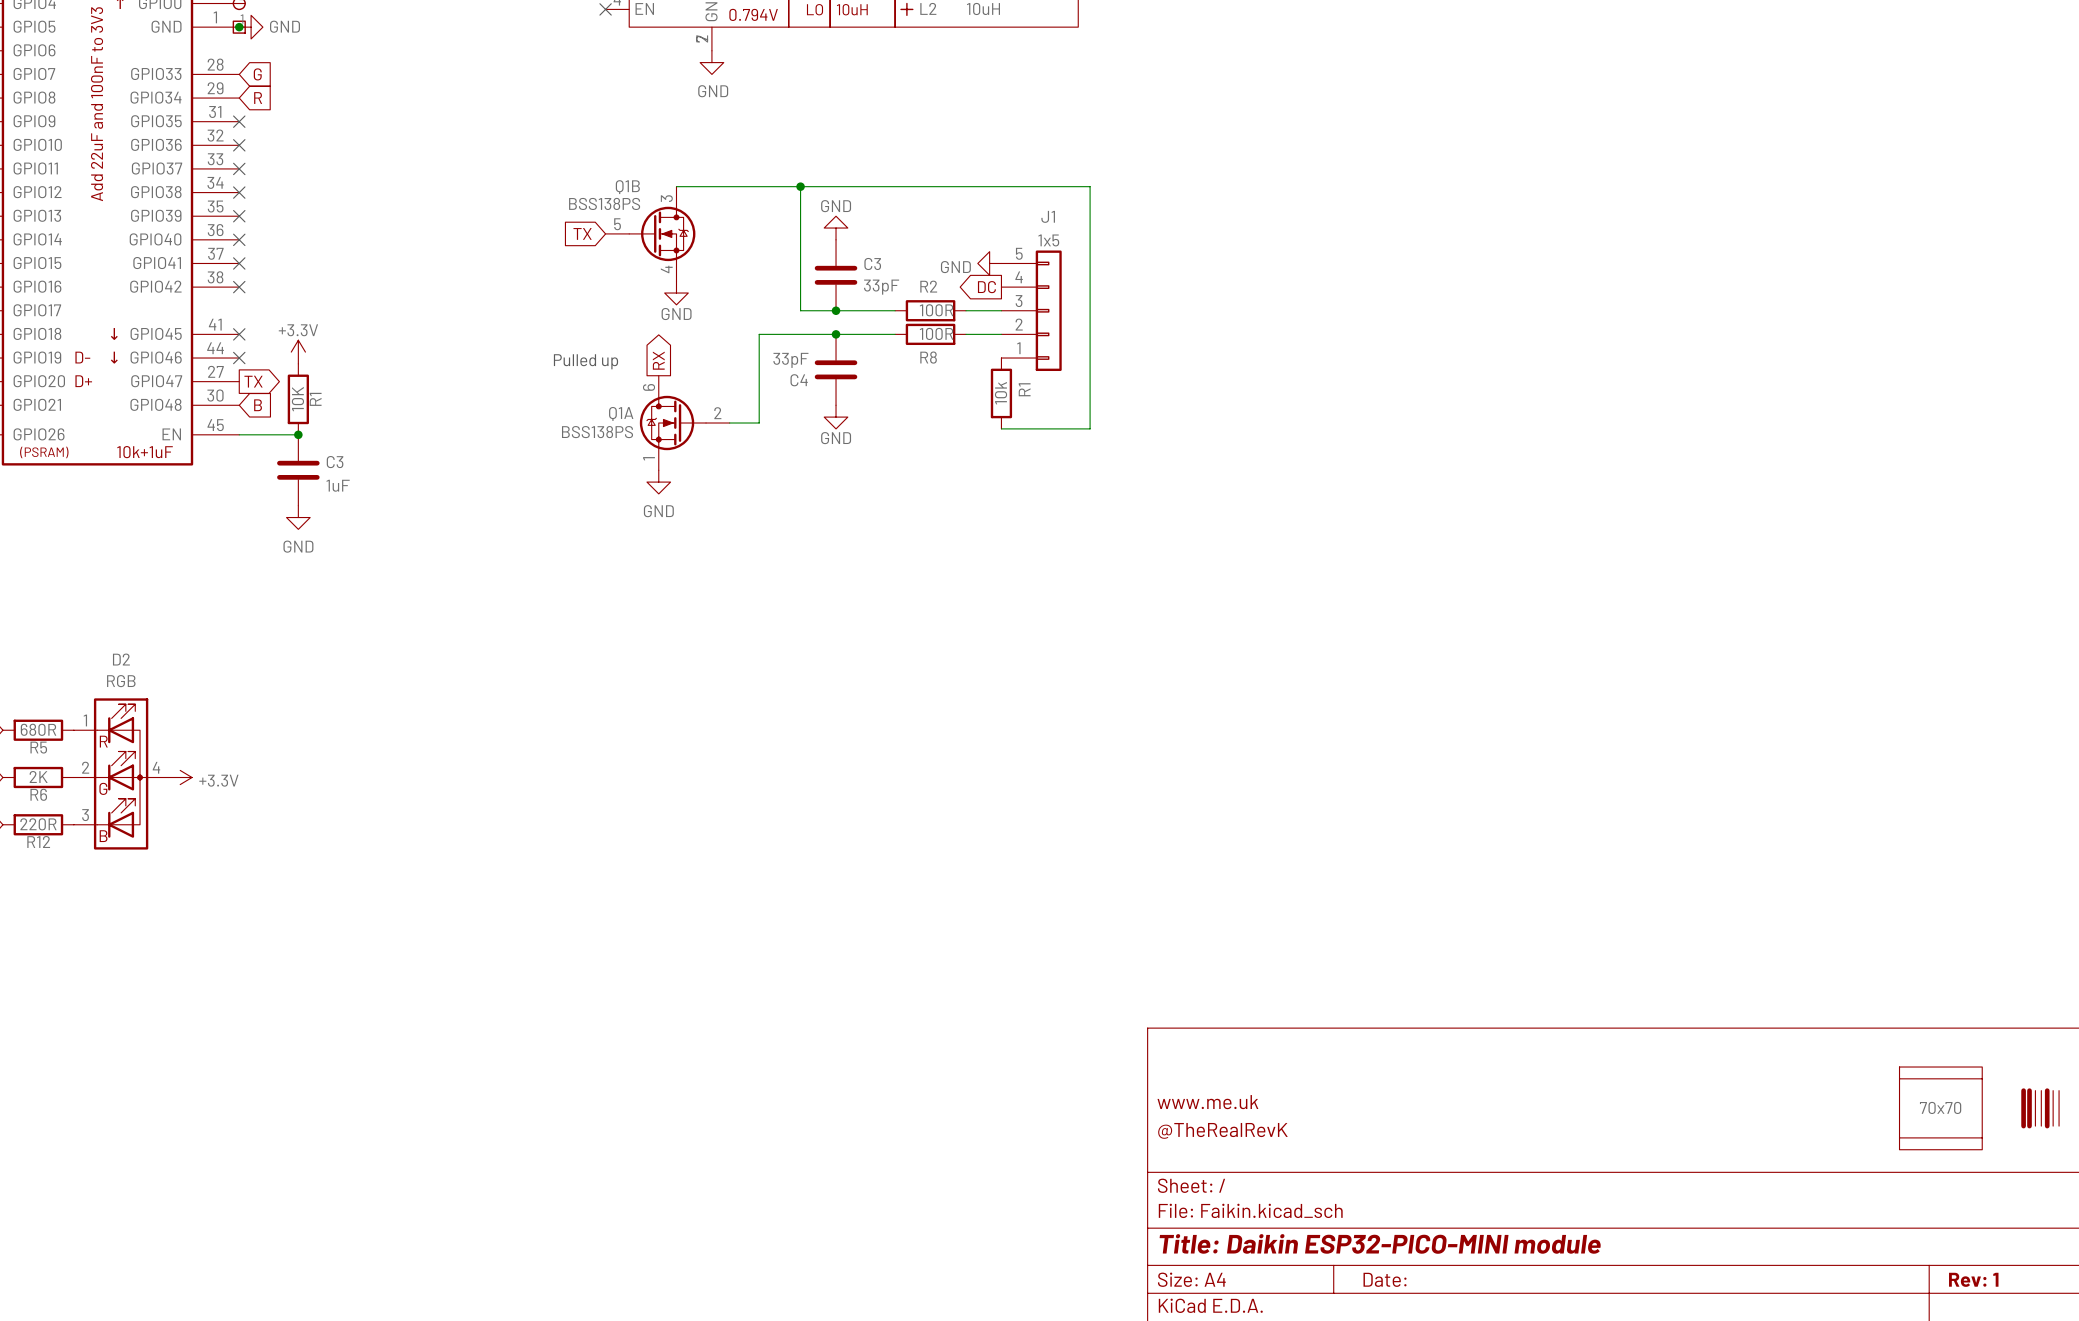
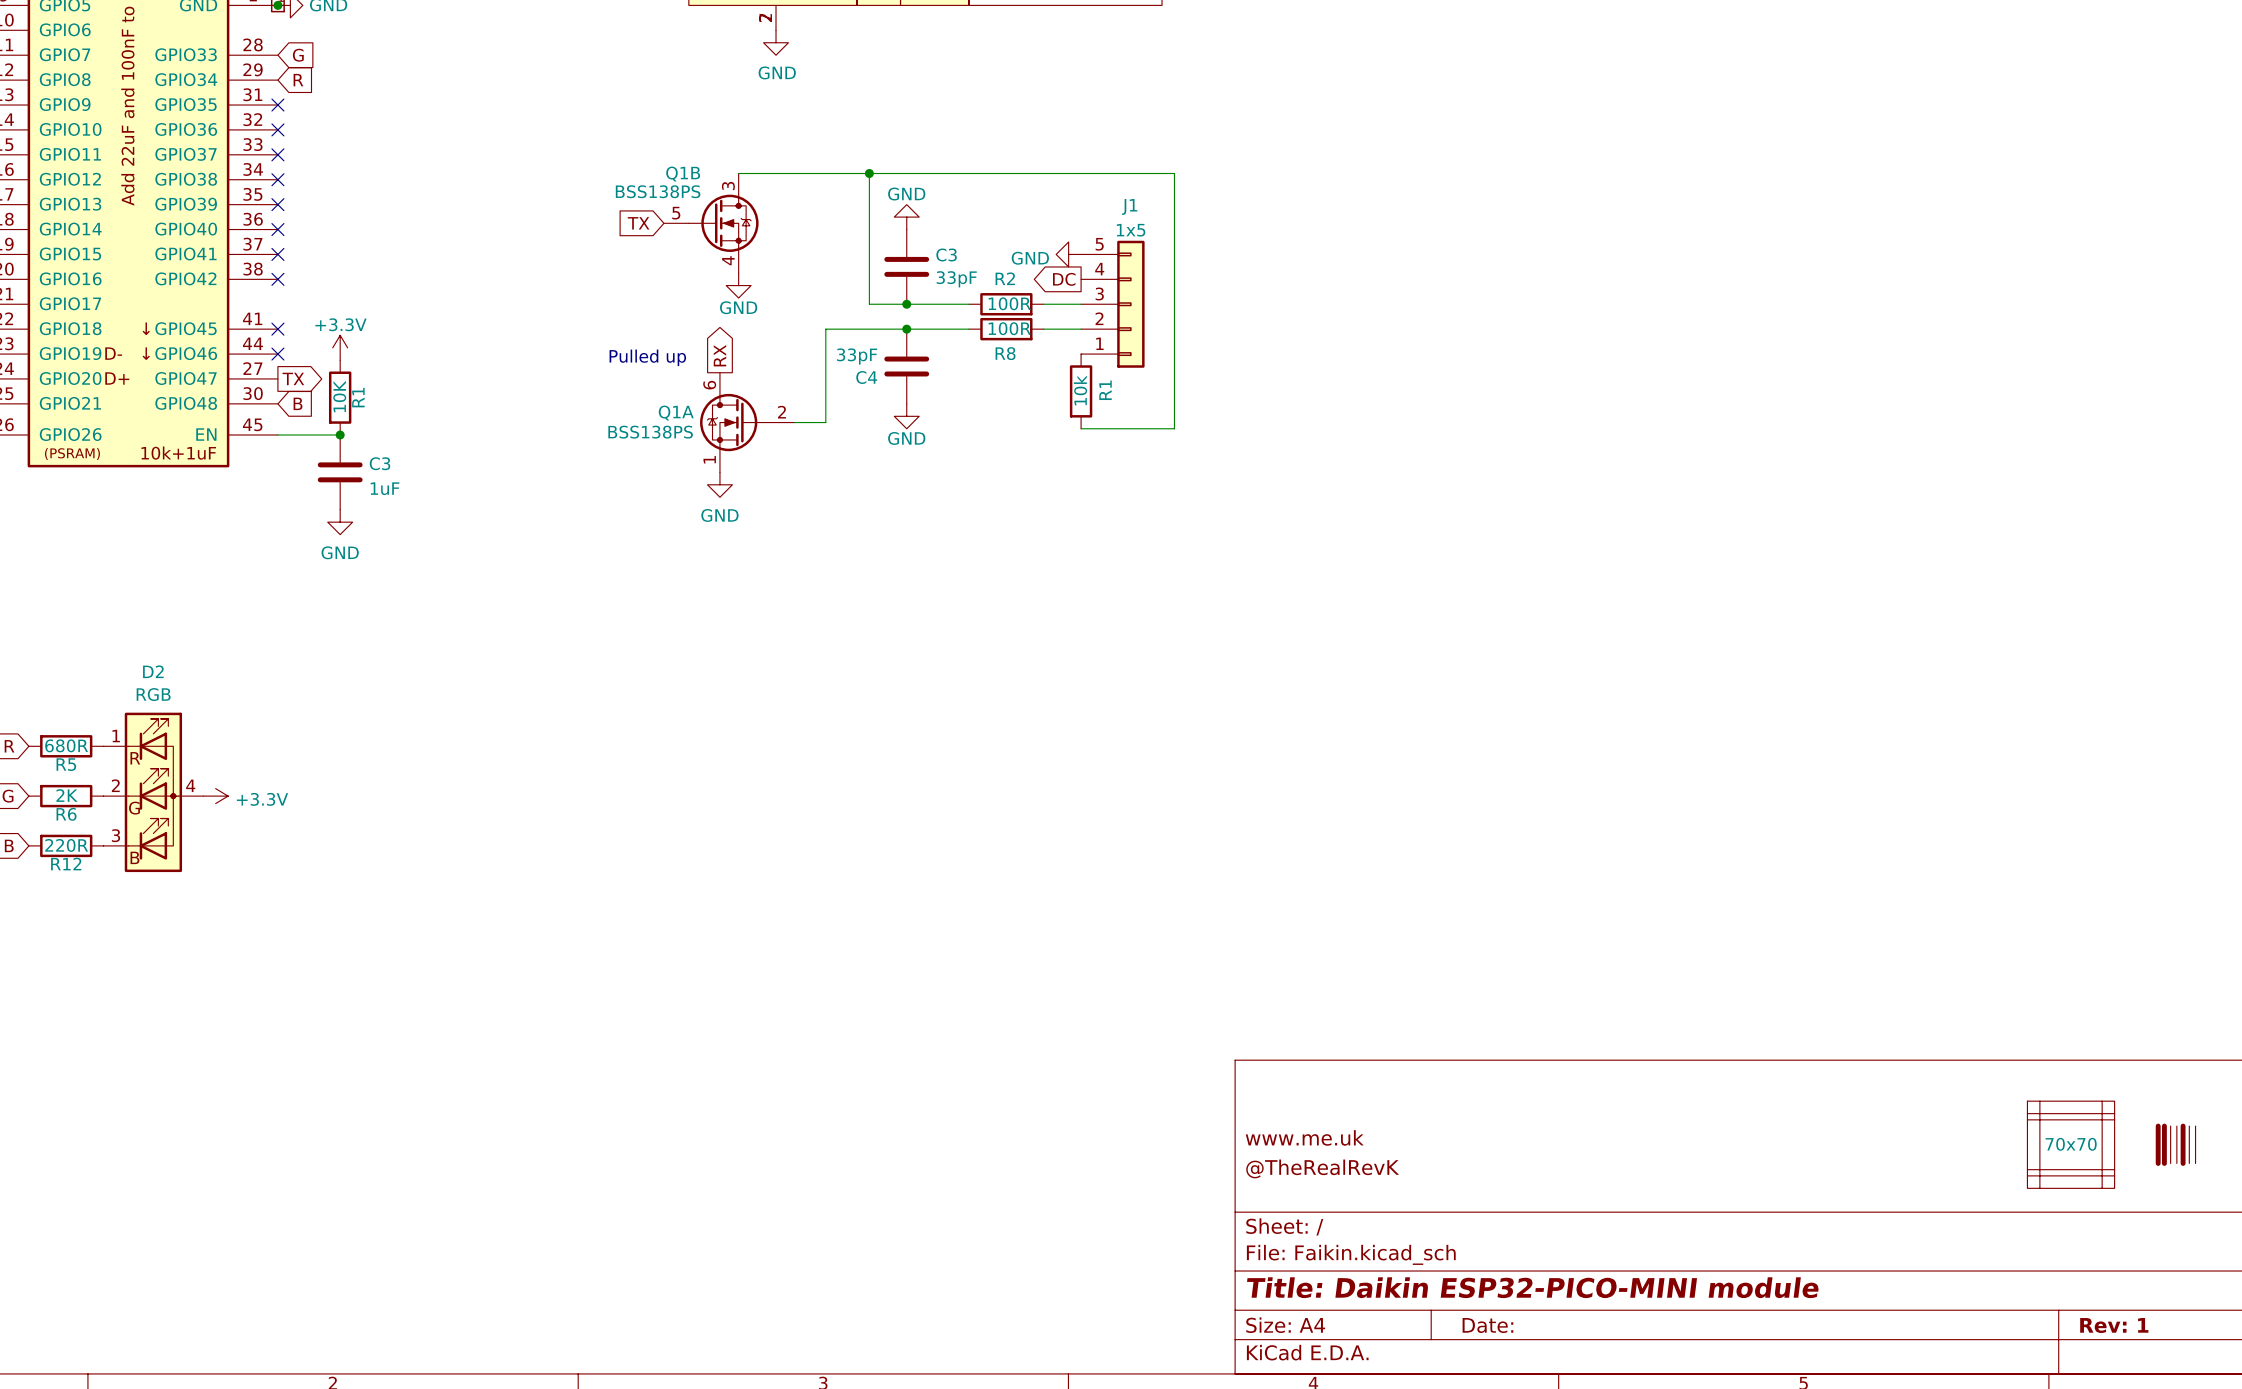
part: none -> (2071, 1119)
part: none -> (2039, 1144)
part: none -> (2102, 1144)
part: none -> (2071, 1169)

